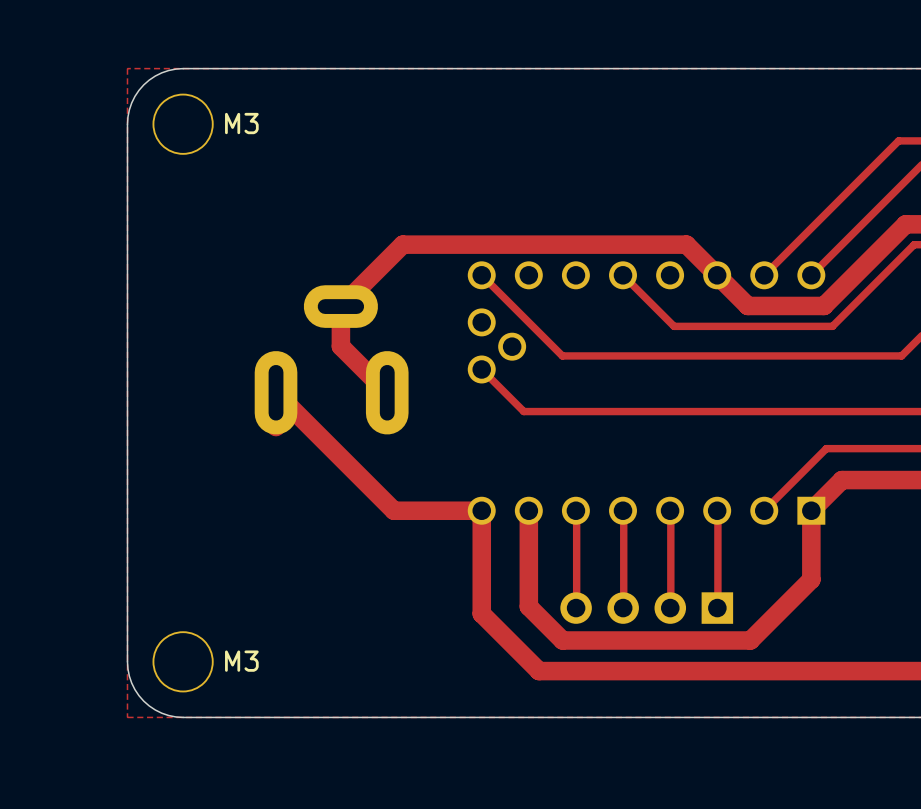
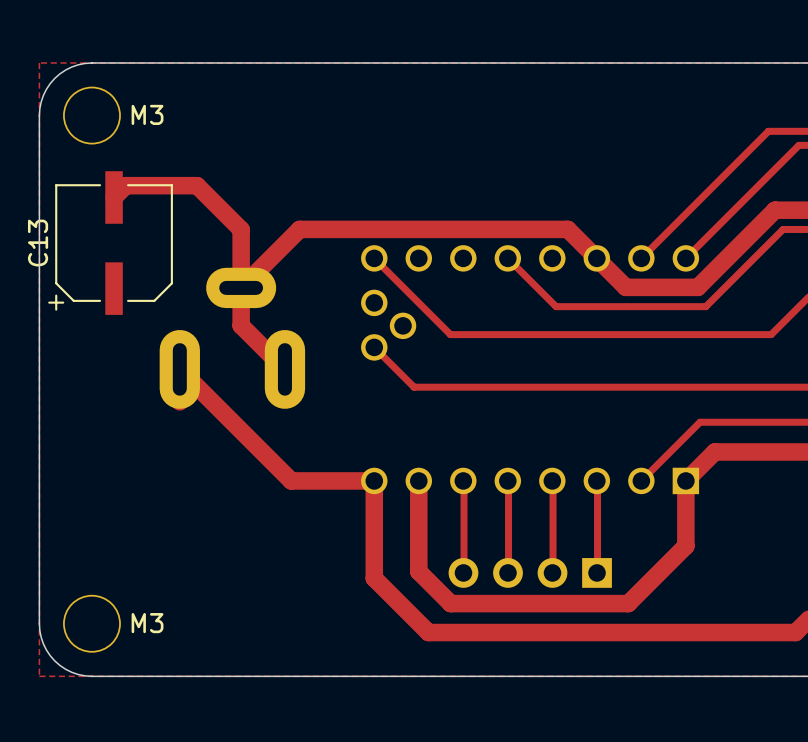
track: none -> (114, 197) (125, 185) (197, 185) (241, 229) (241, 287)
C13: none -> (110, 243)

